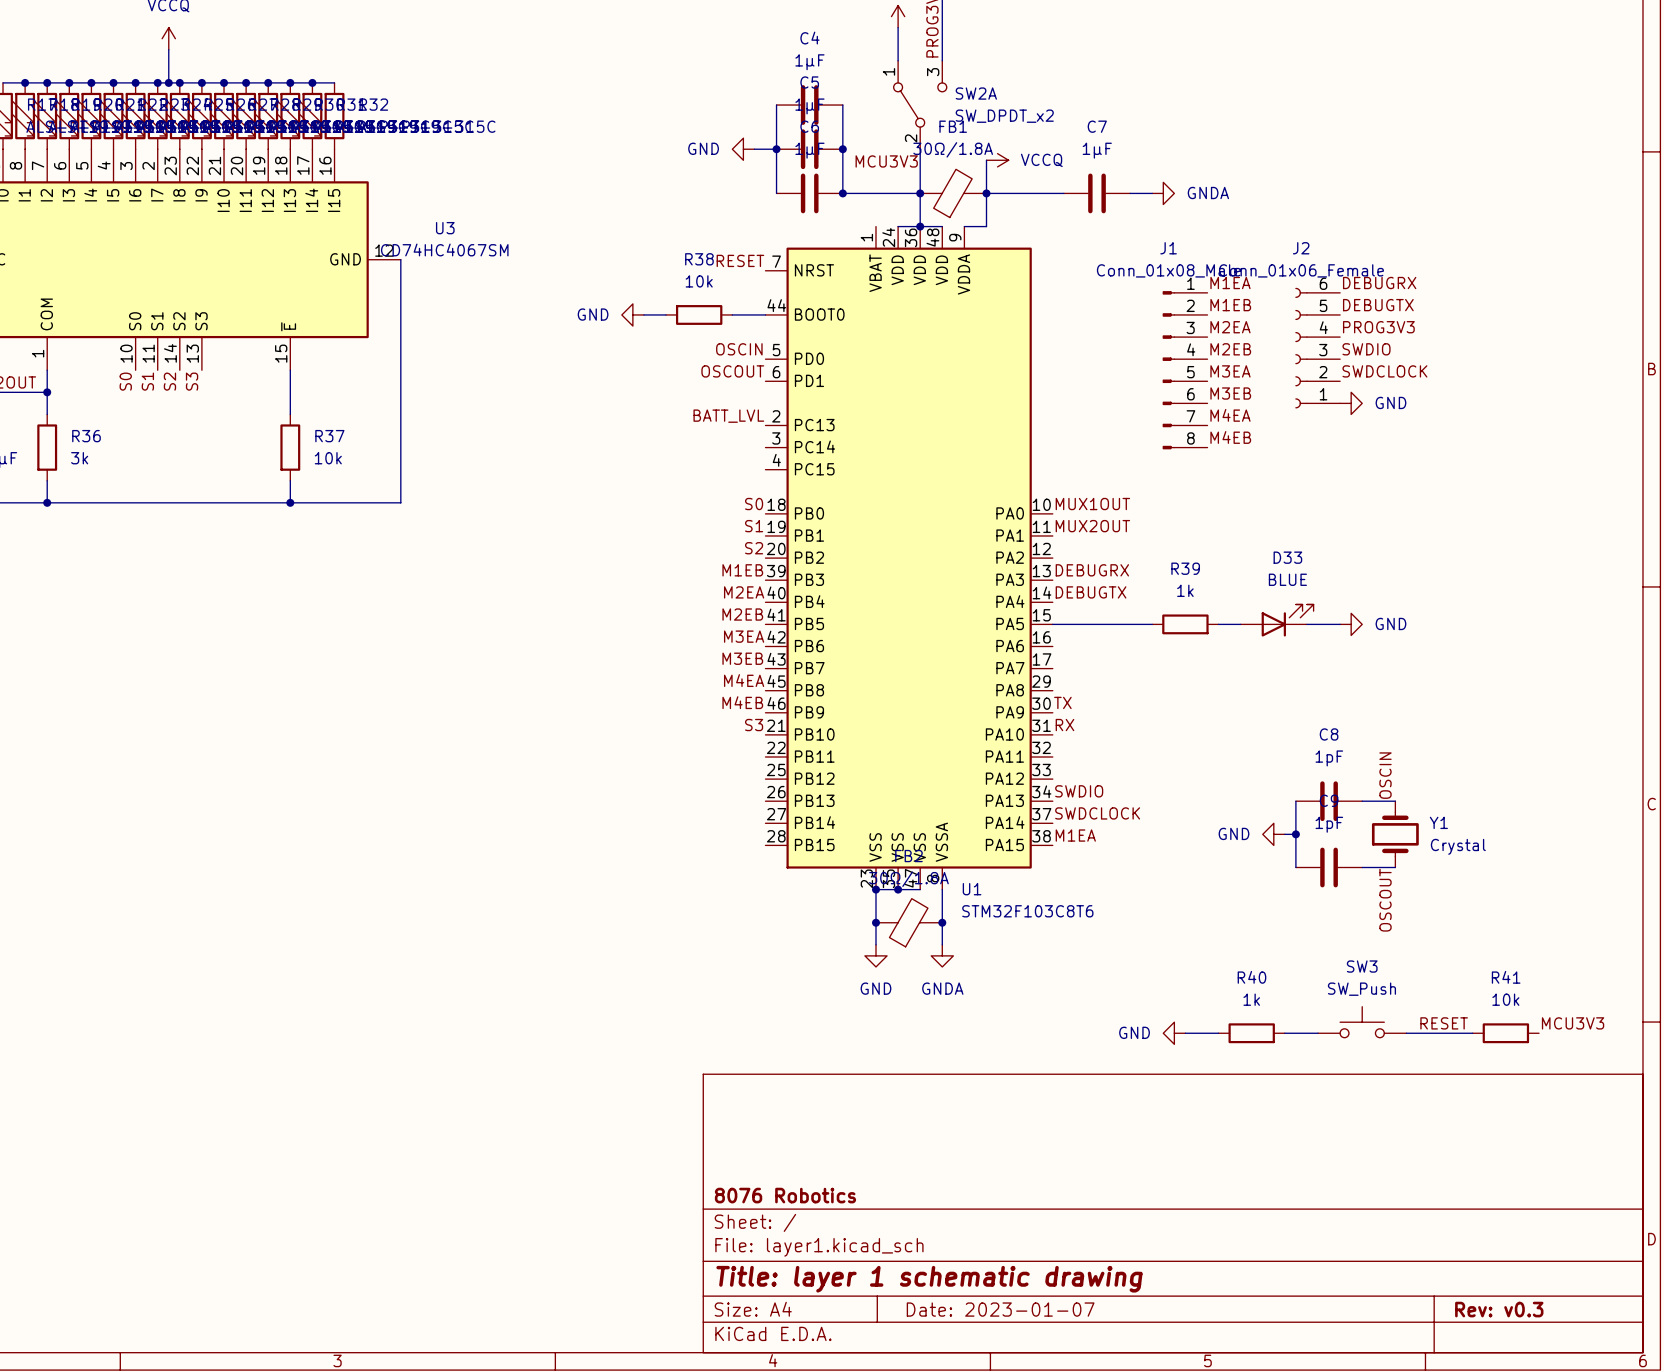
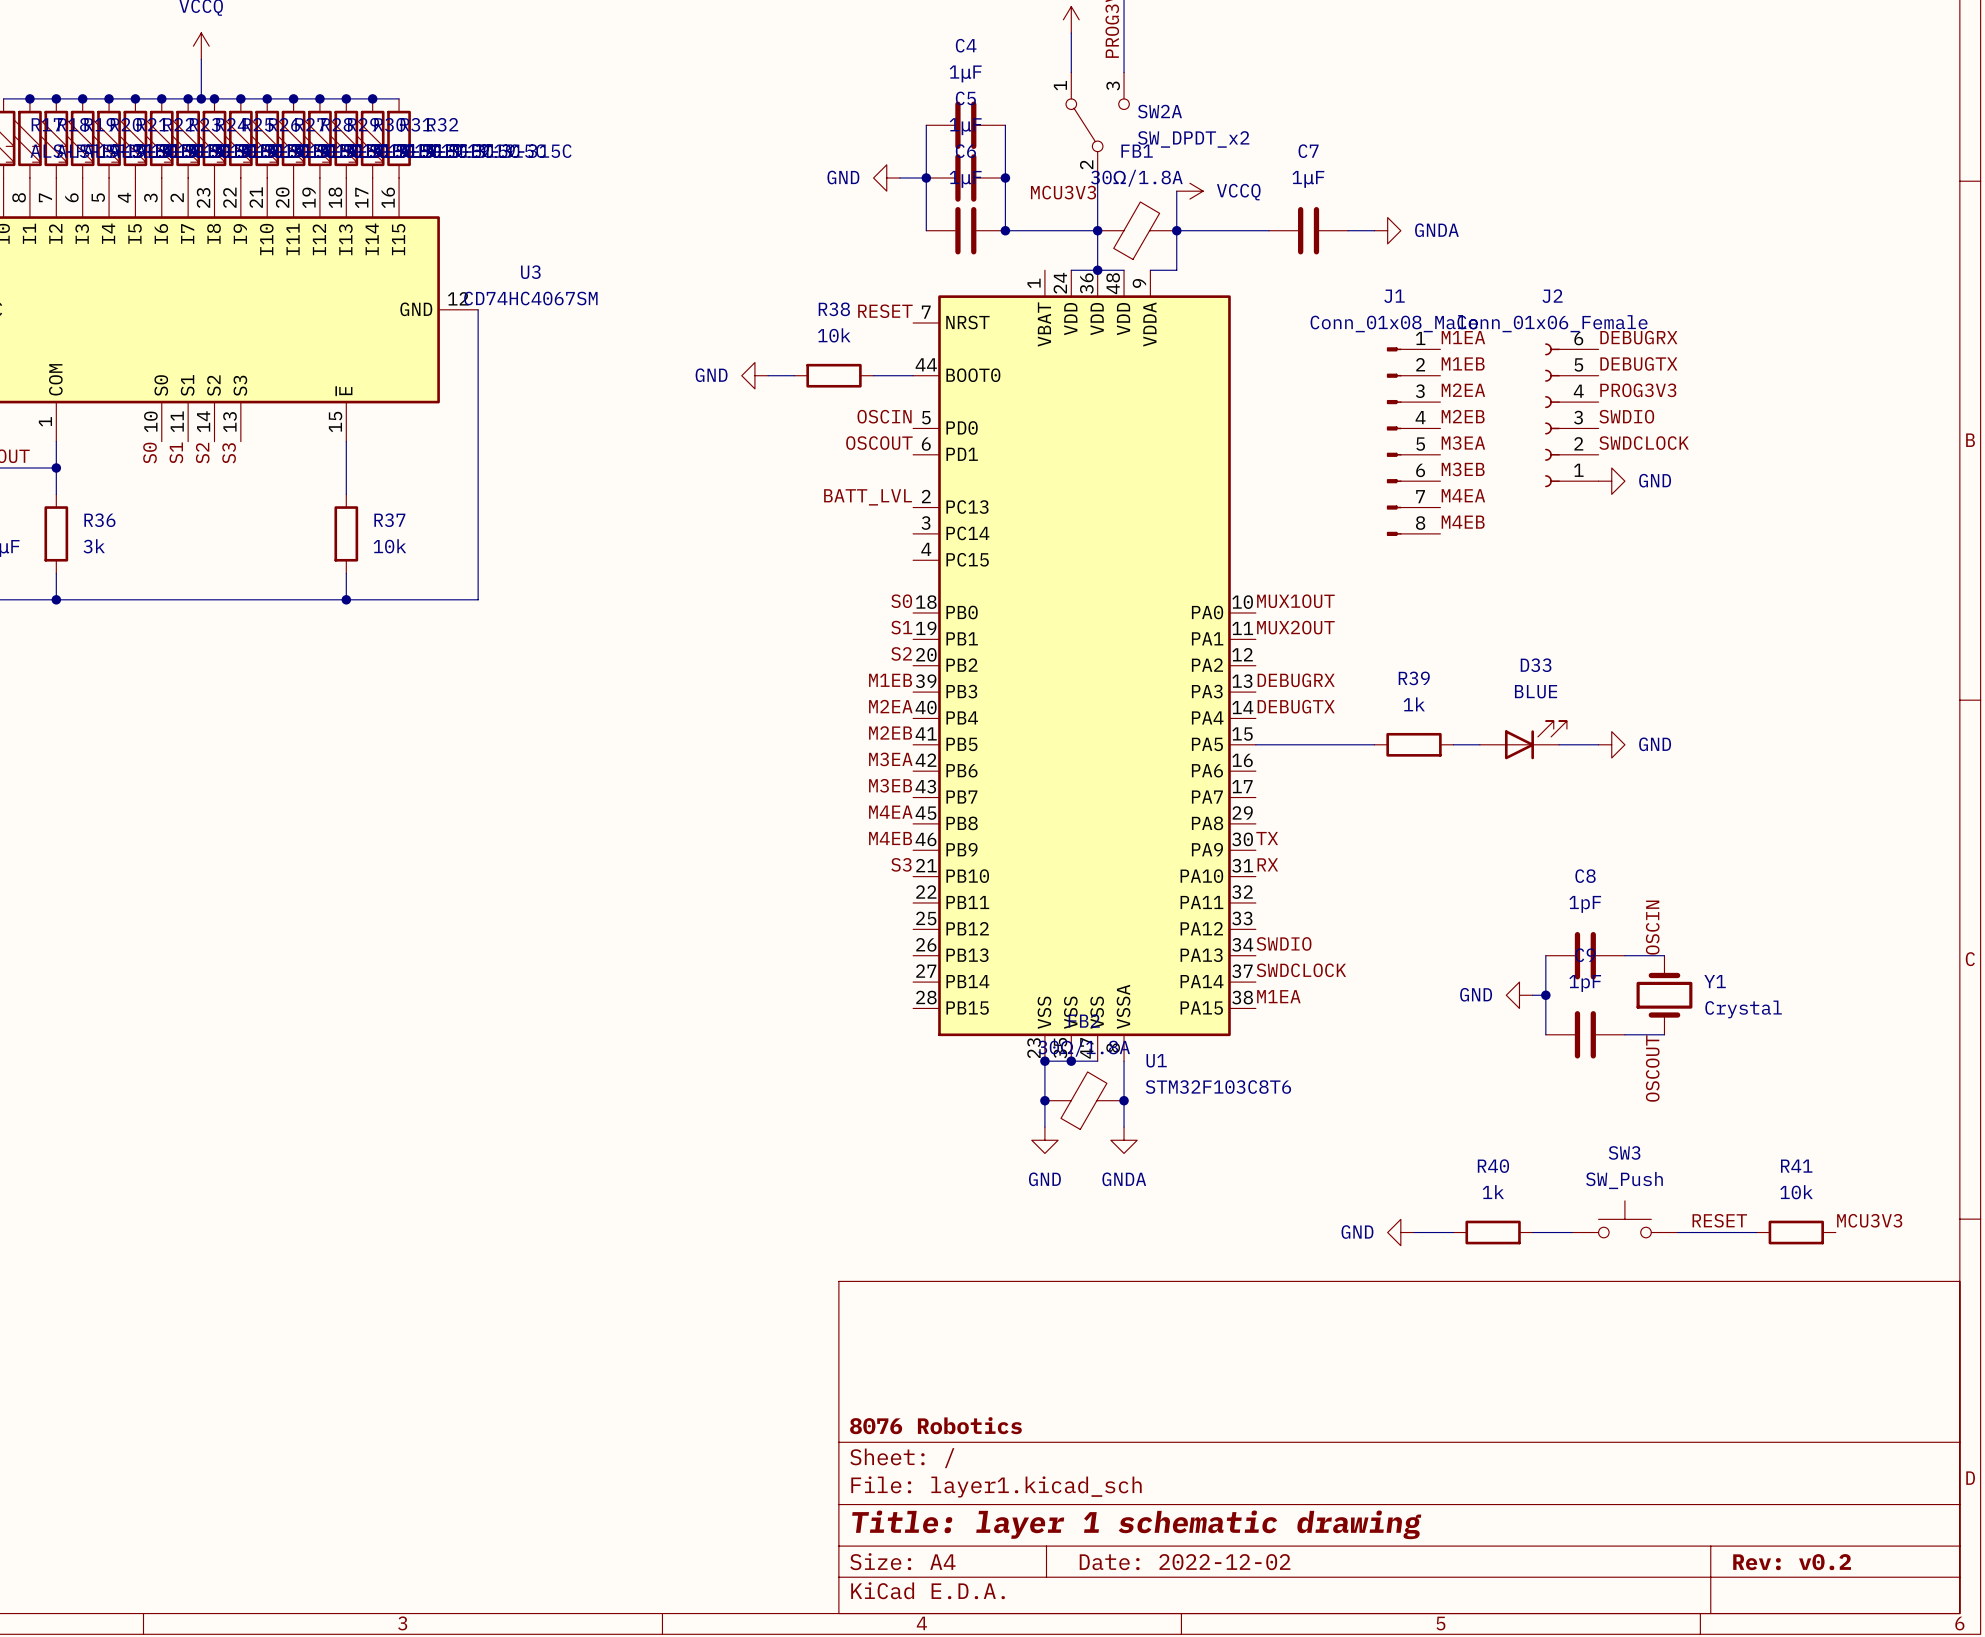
title block: Date: 2023-01-07 (1000, 1309) -> Date: 2022-12-02 (1185, 1562)
title block: Rev: v0.3 (1499, 1309) -> Rev: v0.2 (1792, 1562)

